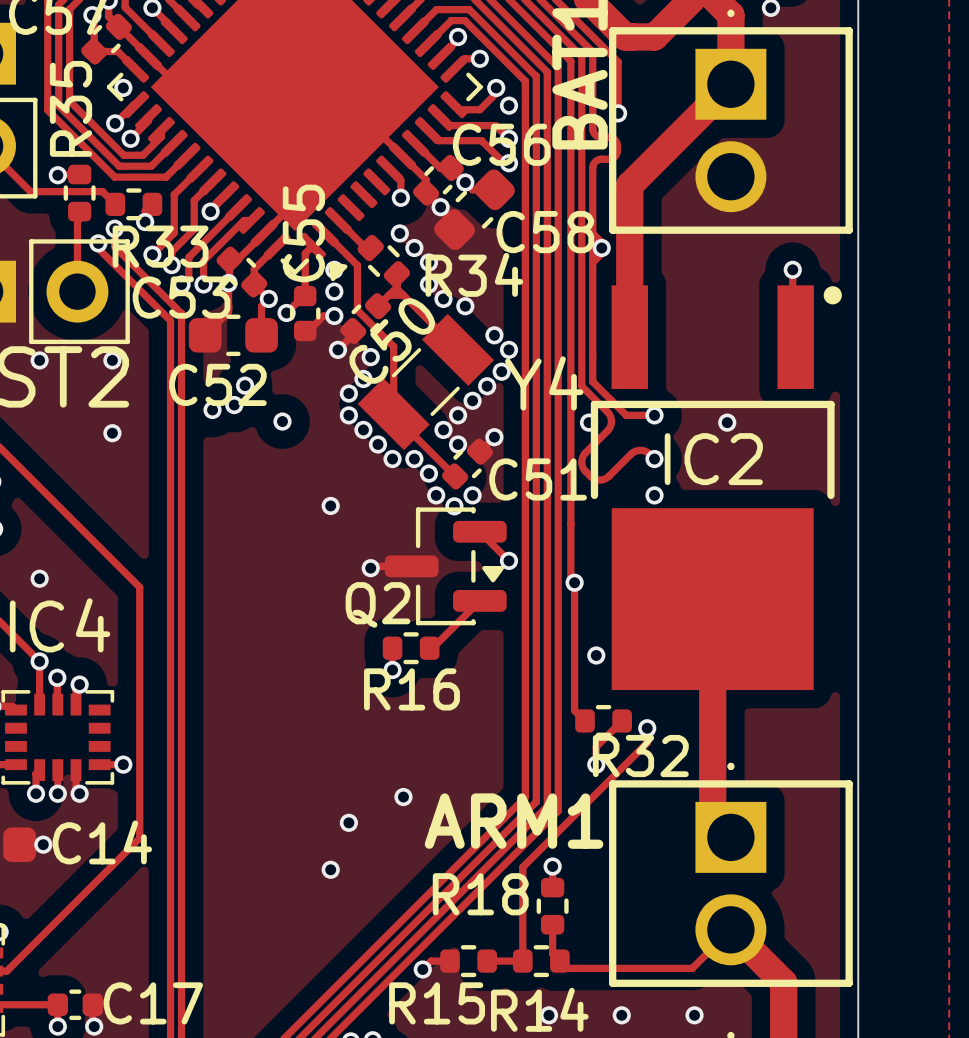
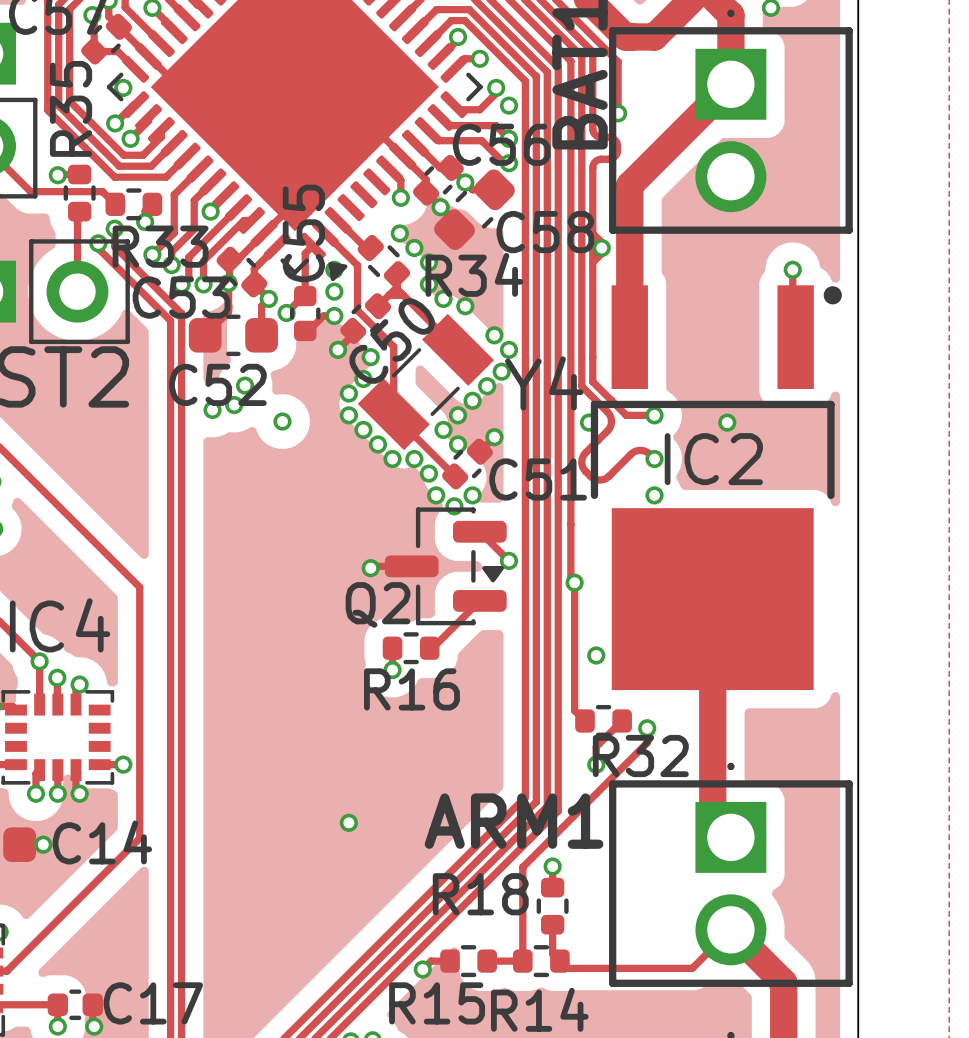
via: (39, 360) -> none
via: (112, 360) -> none
via: (112, 433) -> none
via: (330, 505) -> none
via: (39, 578) -> none
via: (403, 797) -> none
via: (330, 869) -> none
via: (548, 1015) -> none
via: (621, 1015) -> none
via: (694, 1015) -> none

